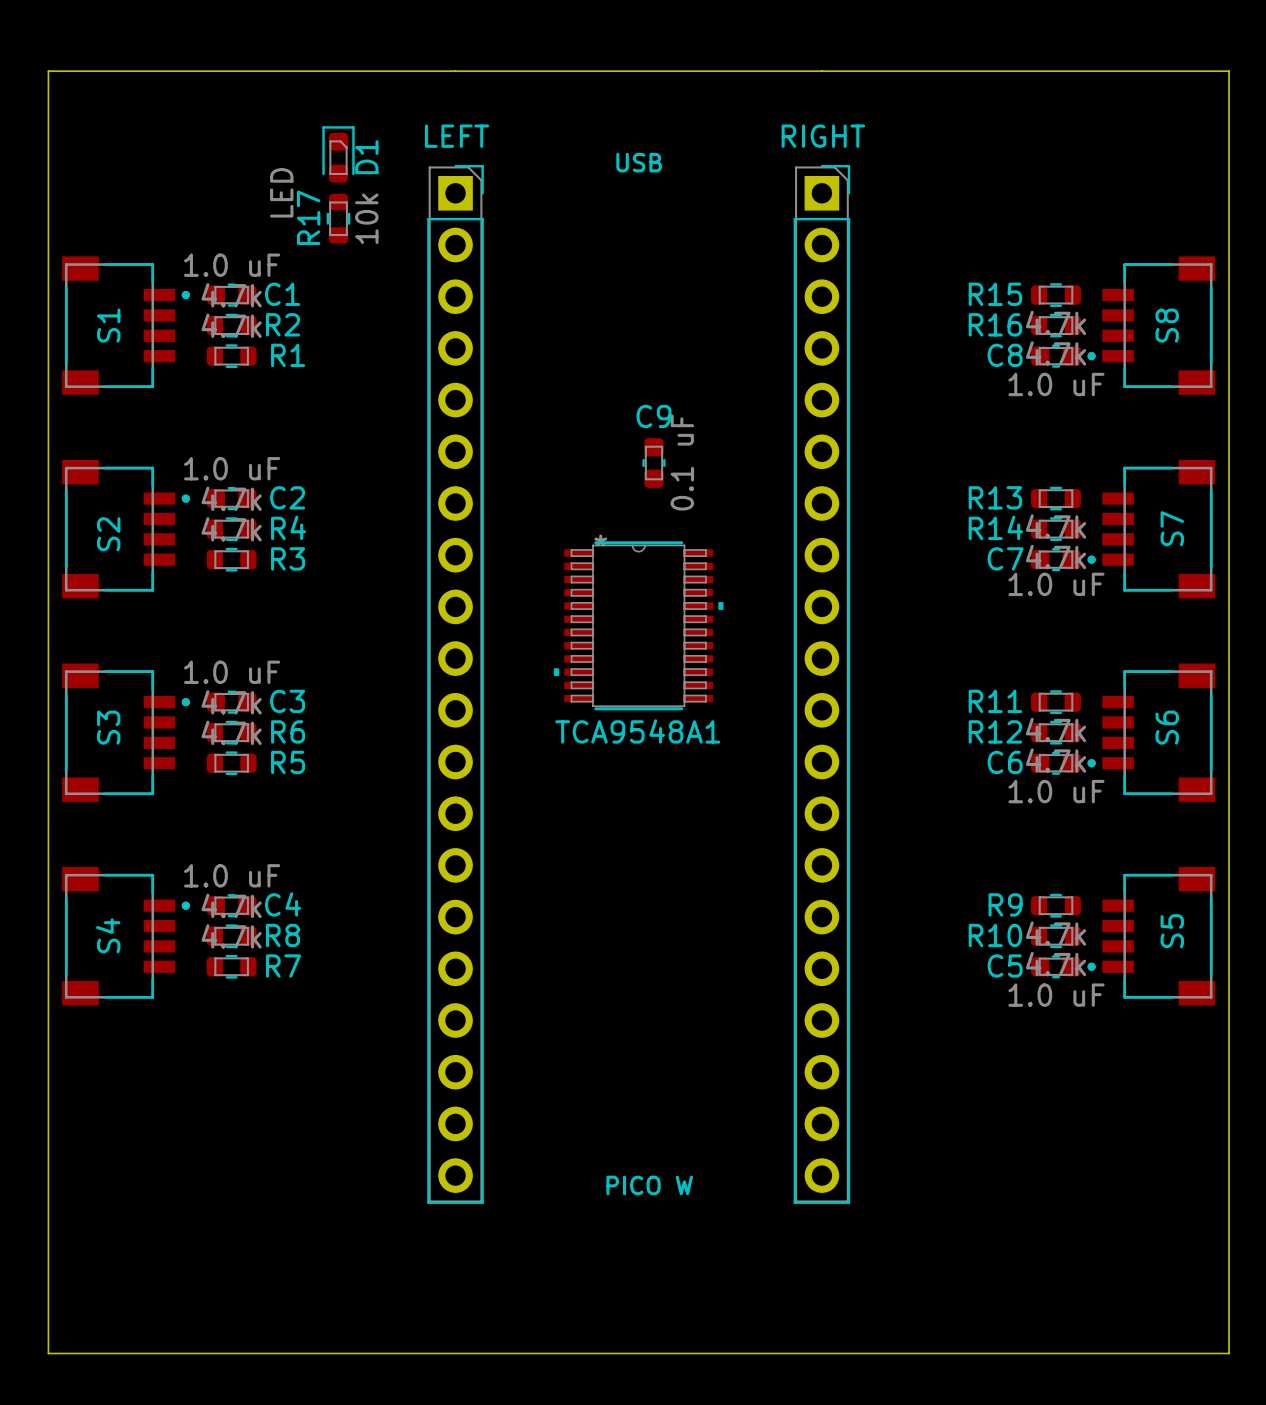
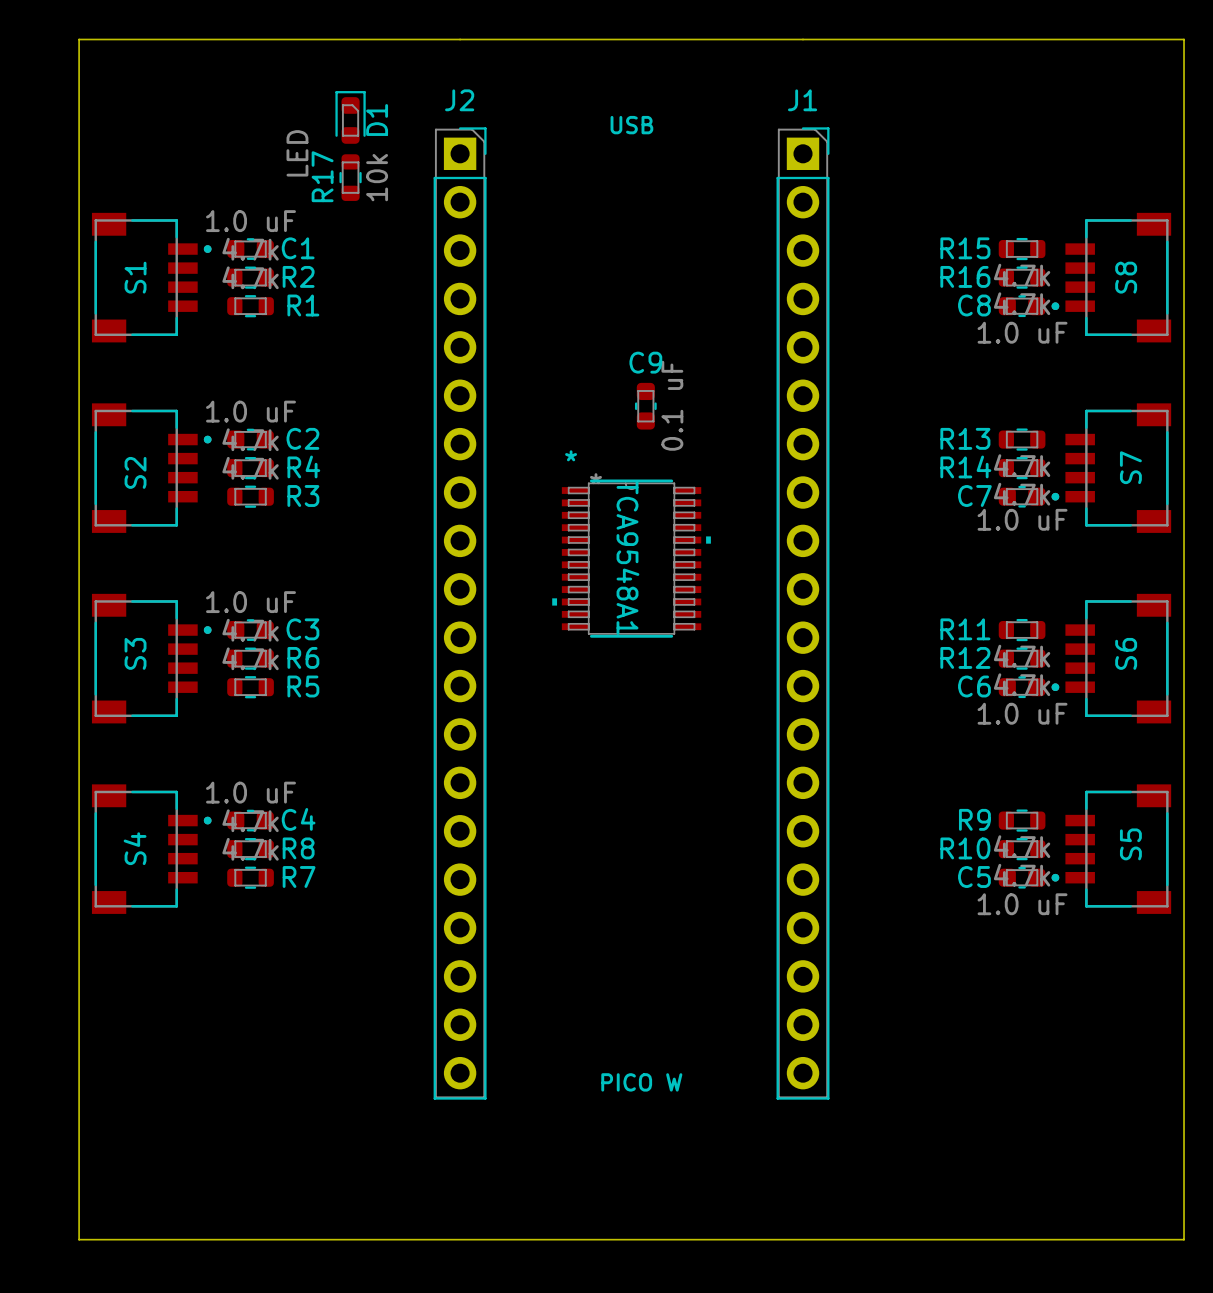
LEFT name: LEFT (456, 136) -> J2 (459, 100)
RIGHT name: RIGHT (823, 136) -> J1 (802, 100)
TCA9548A1 text: none -> * (571, 455)
TCA9548A1 name rotation: 0° (637, 731) -> 90° clockwise (627, 557)

